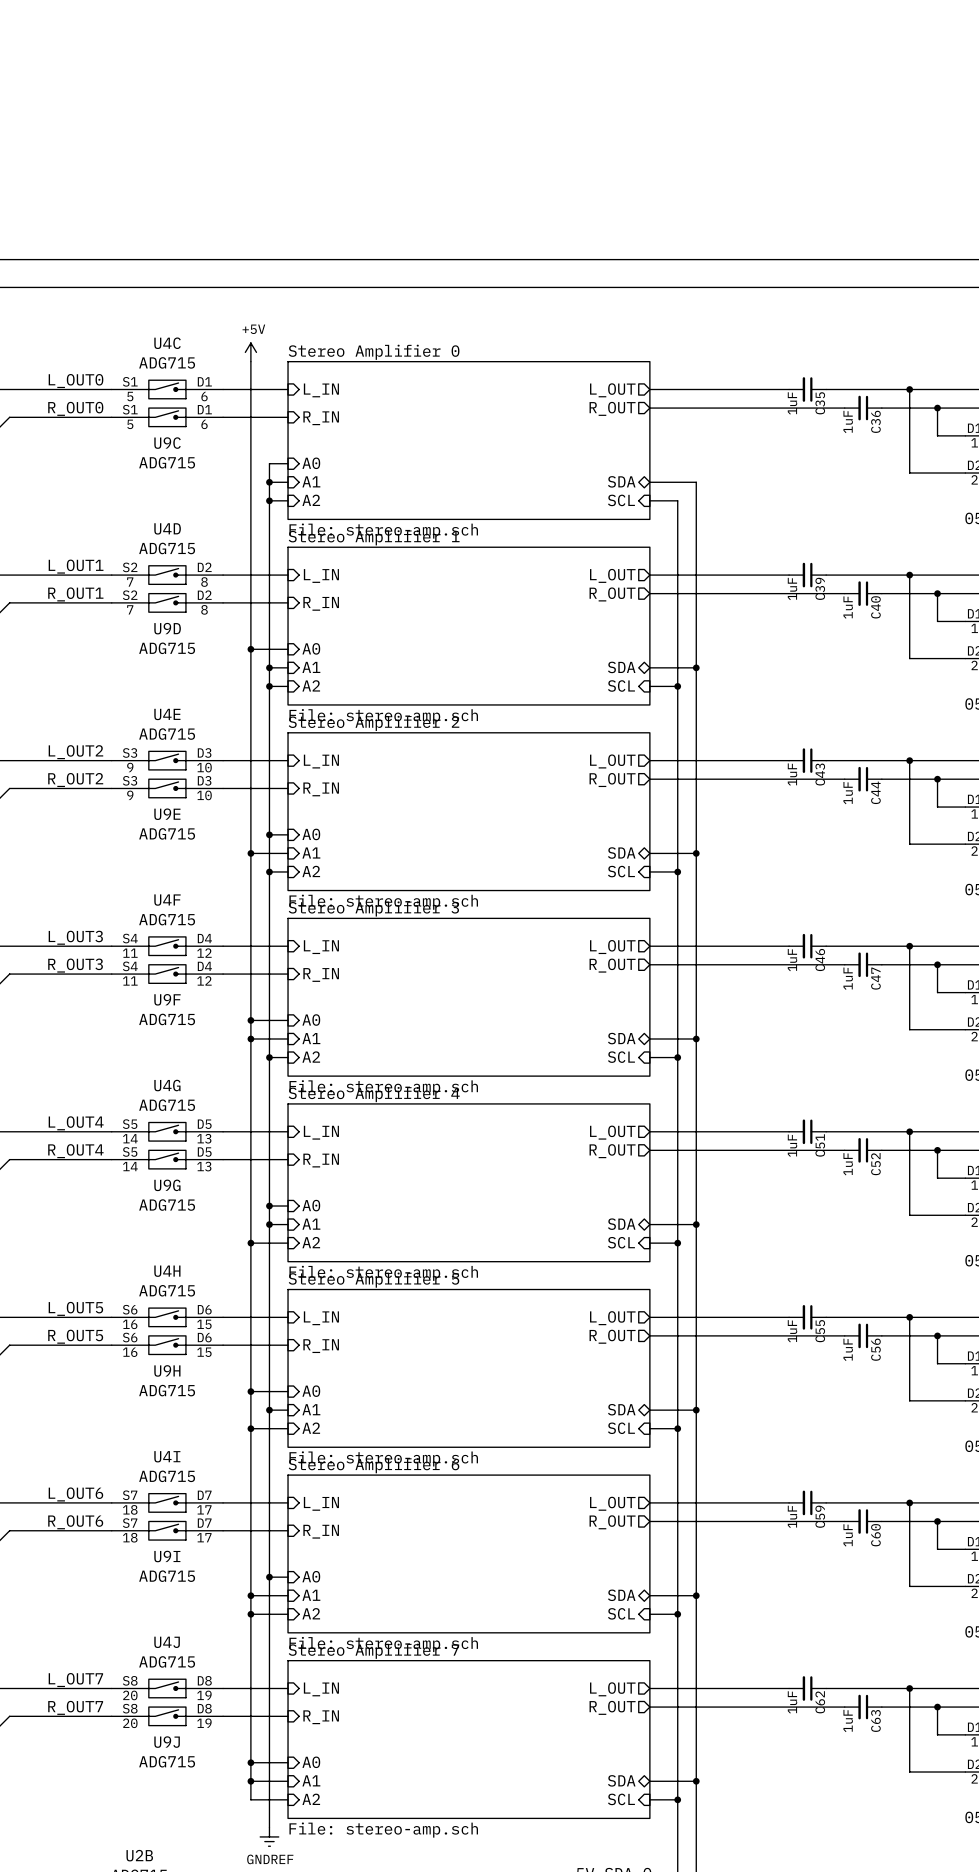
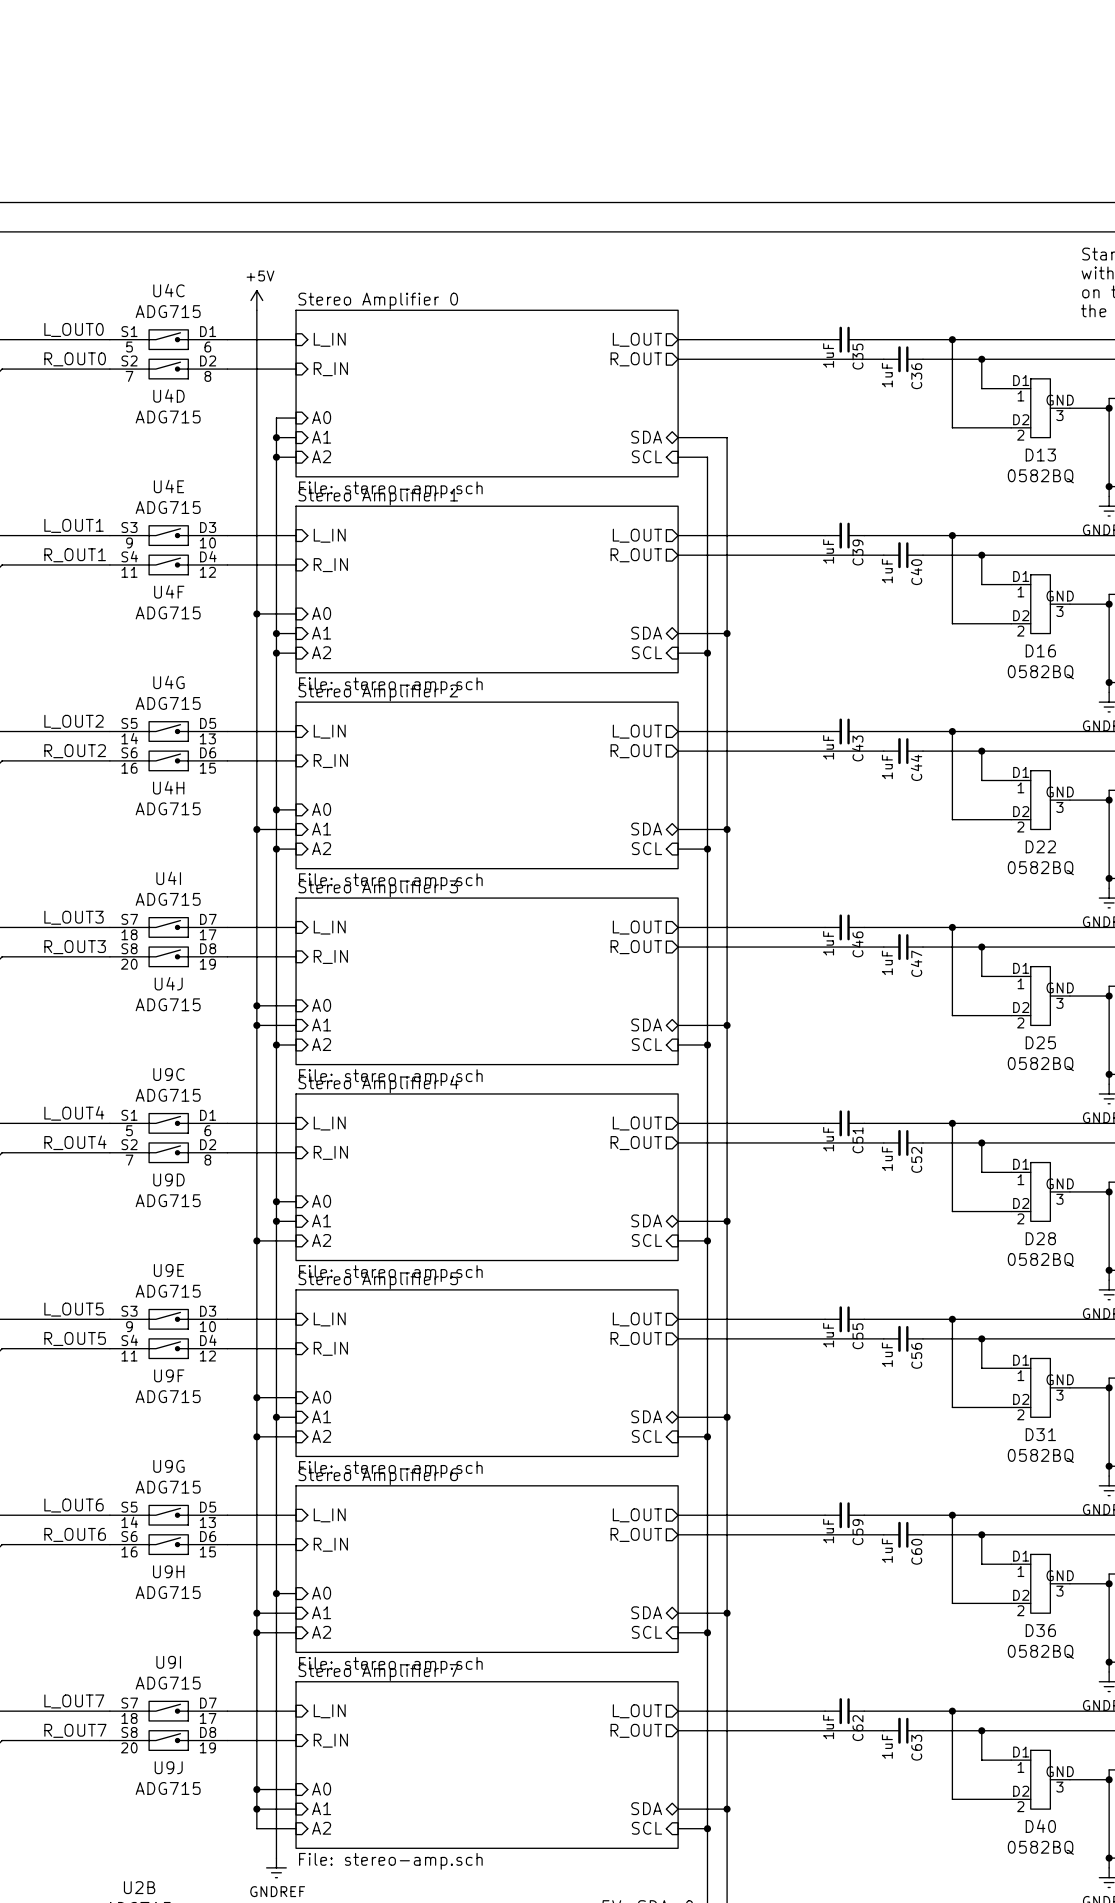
U9C position: (167, 417) -> (168, 1123)
U9C name position: U9C (167, 443) -> U9C (168, 1074)
U4D name position: U4D (167, 528) -> U4D (168, 395)
U4D position: (167, 575) -> (168, 369)
U9D position: (167, 602) -> (168, 1152)
U4E position: (167, 760) -> (168, 535)
U9E position: (167, 788) -> (168, 1319)
U9E name position: U9E (167, 814) -> U9E (168, 1270)
U4F name position: U4F (167, 900) -> U4F (169, 591)
U4F position: (167, 946) -> (168, 564)
U9F position: (167, 974) -> (168, 1348)
U4G position: (167, 1131) -> (168, 731)
U9G position: (167, 1159) -> (168, 1515)
U9G name position: U9G (167, 1185) -> U9G (168, 1466)
U4H name position: U4H (167, 1271) -> U4H (168, 787)
U4H position: (167, 1317) -> (168, 760)
U9H position: (167, 1345) -> (168, 1544)
U4I position: (167, 1502) -> (168, 927)
U9I position: (167, 1530) -> (168, 1711)
U9I name position: U9I (167, 1556) -> U9I (168, 1662)
U4J name position: U4J (167, 1642) -> U4J (168, 983)
U4J position: (167, 1688) -> (168, 956)

